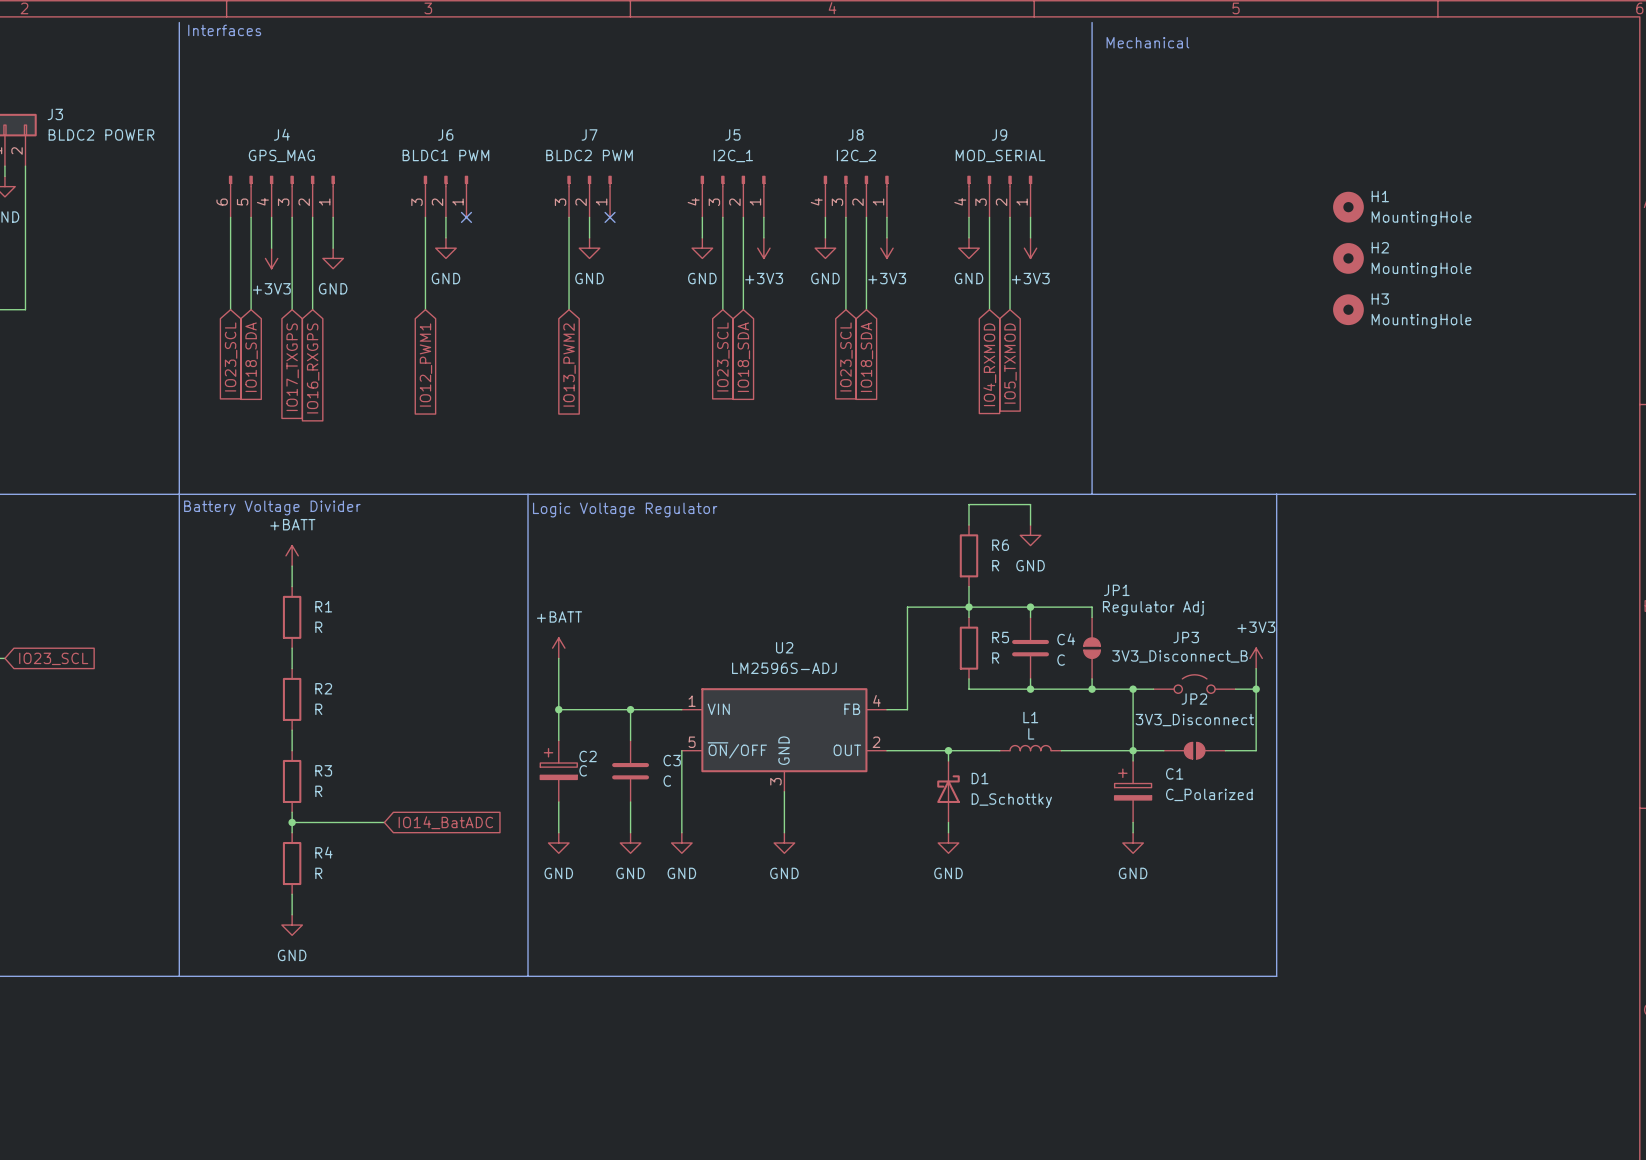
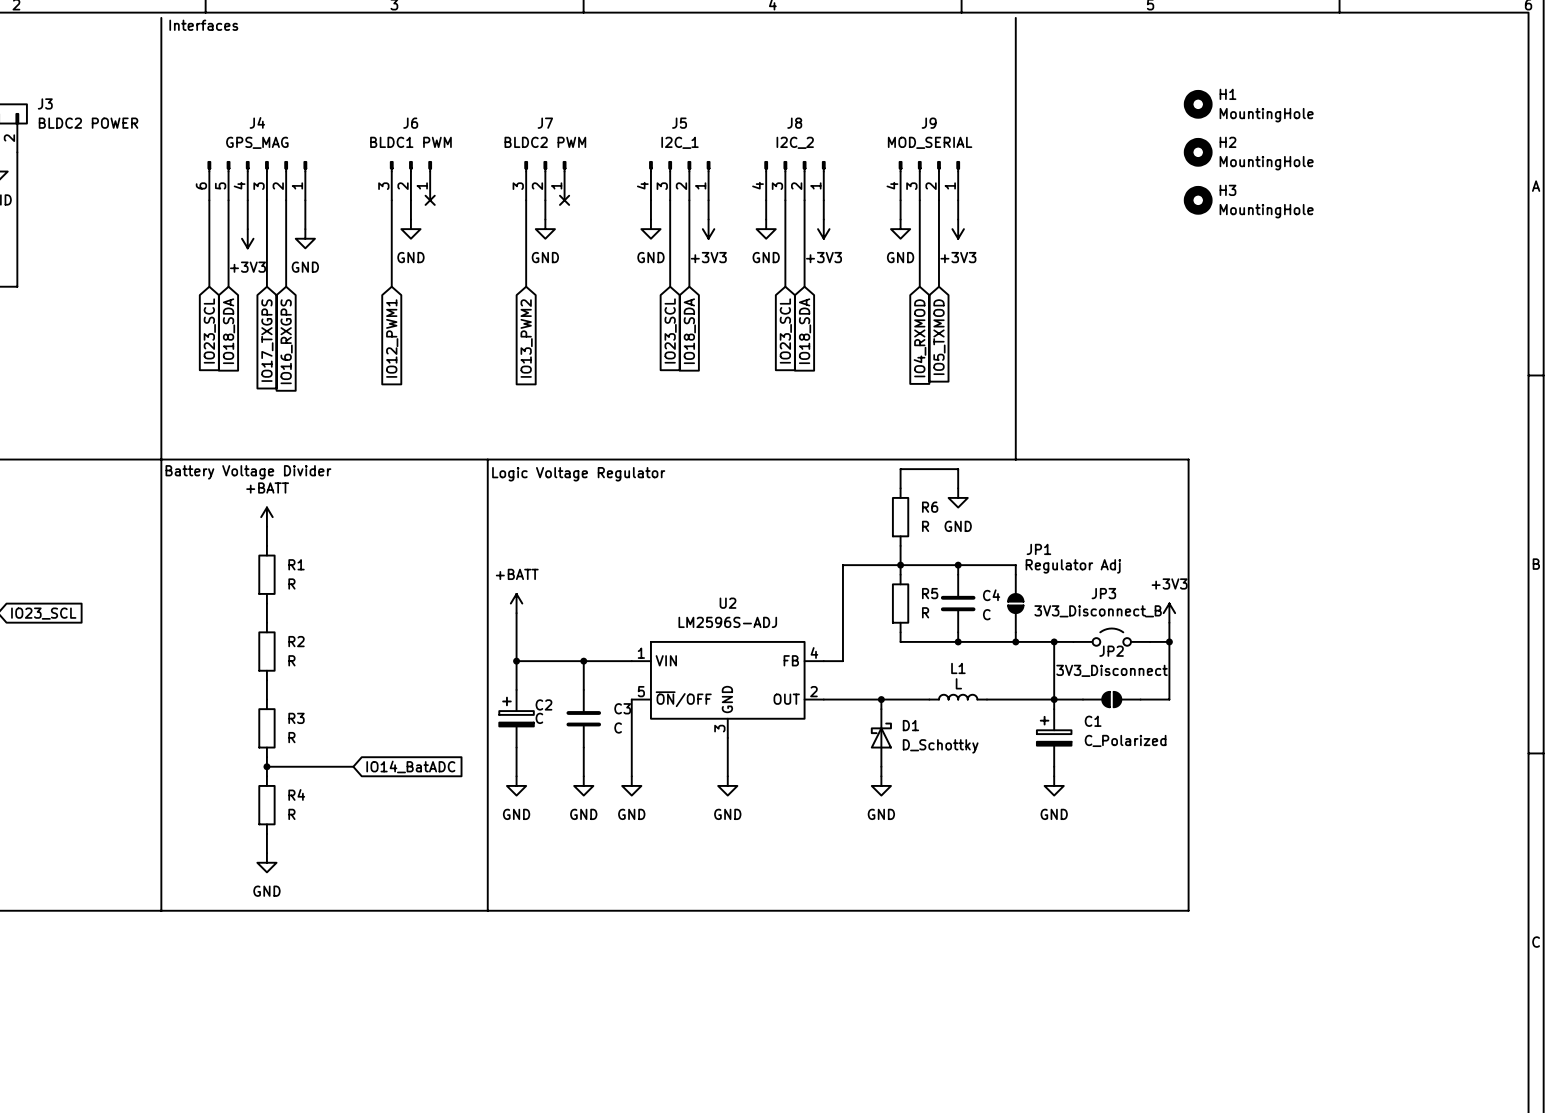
text: Mechanical (1147, 42) -> none
H1 position: (1348, 207) -> (1198, 104)
H2 position: (1348, 258) -> (1198, 152)
H3 position: (1348, 309) -> (1198, 200)
line: (1276, 494) (1635, 494) -> none

